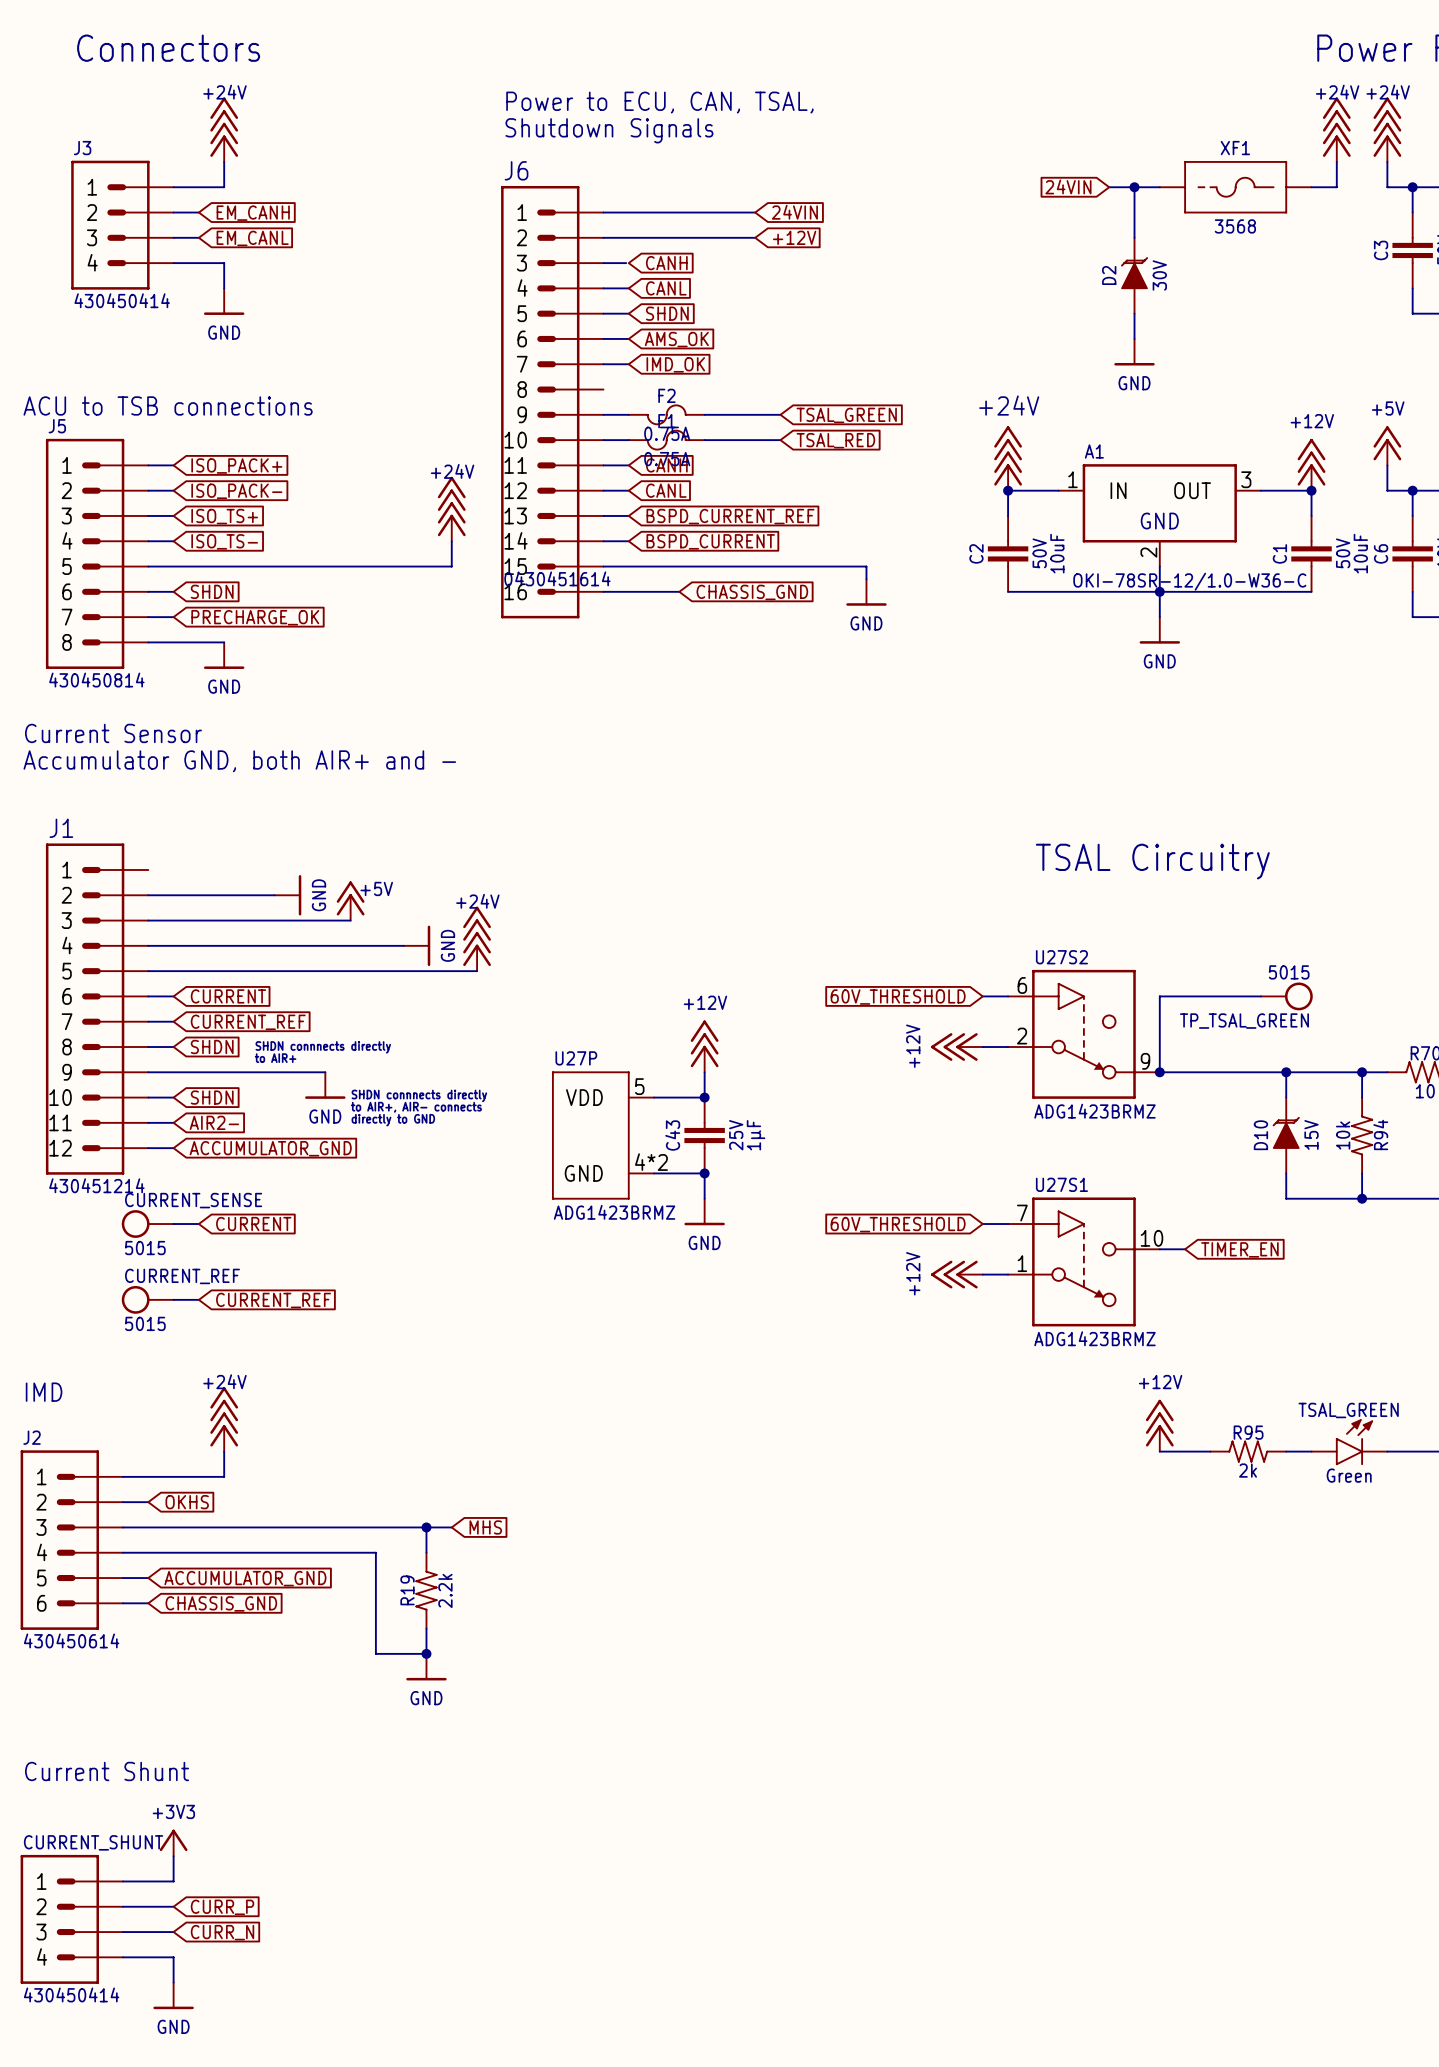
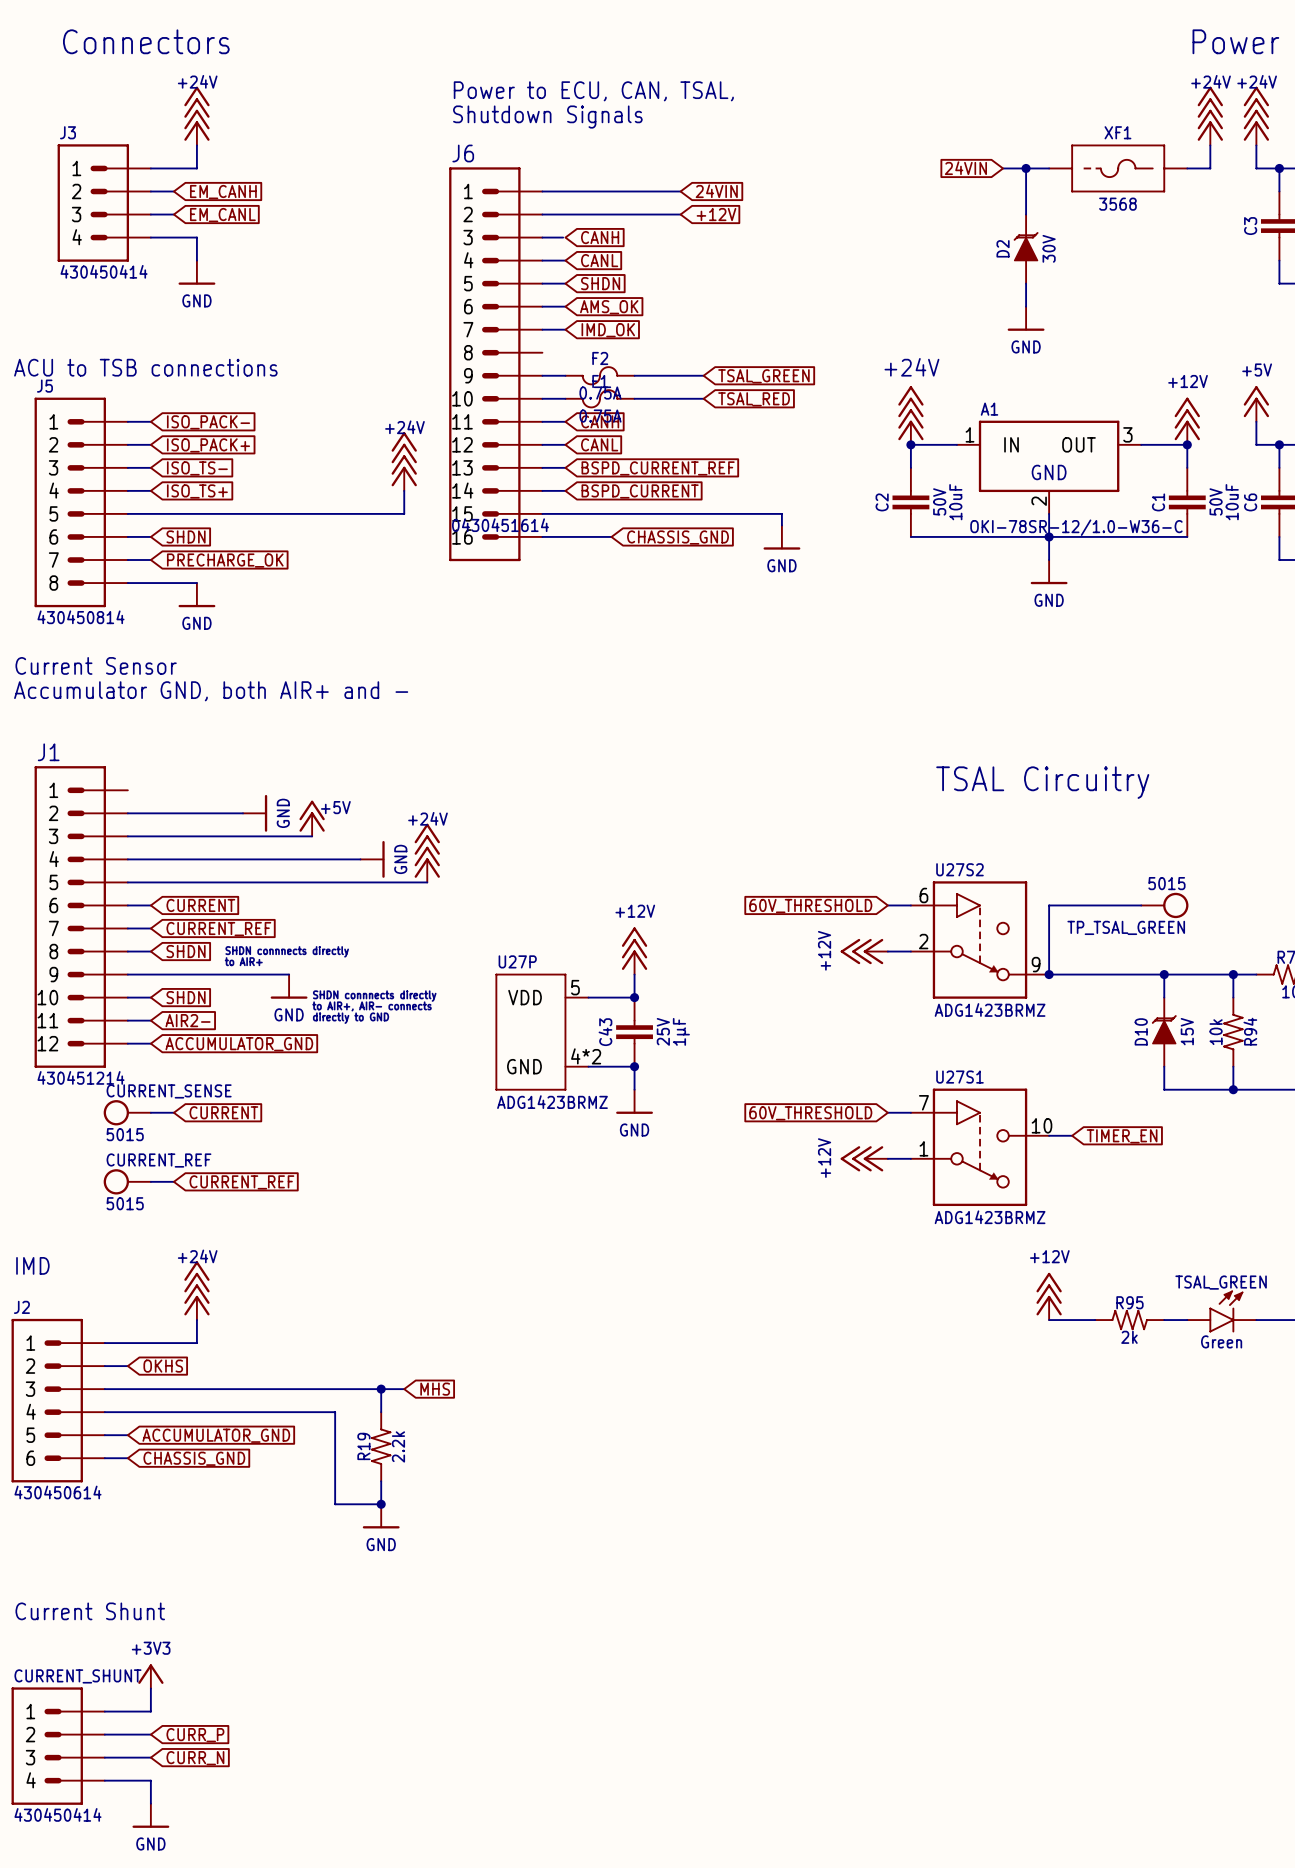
global label: ISO_PACK+ (236, 466) -> ISO_PACK- (208, 422)
global label: ISO_PACK- (236, 491) -> ISO_PACK+ (208, 445)
global label: ISO_TS+ (224, 516) -> ISO_TS- (197, 468)
global label: ISO_TS- (224, 541) -> ISO_TS+ (197, 491)

